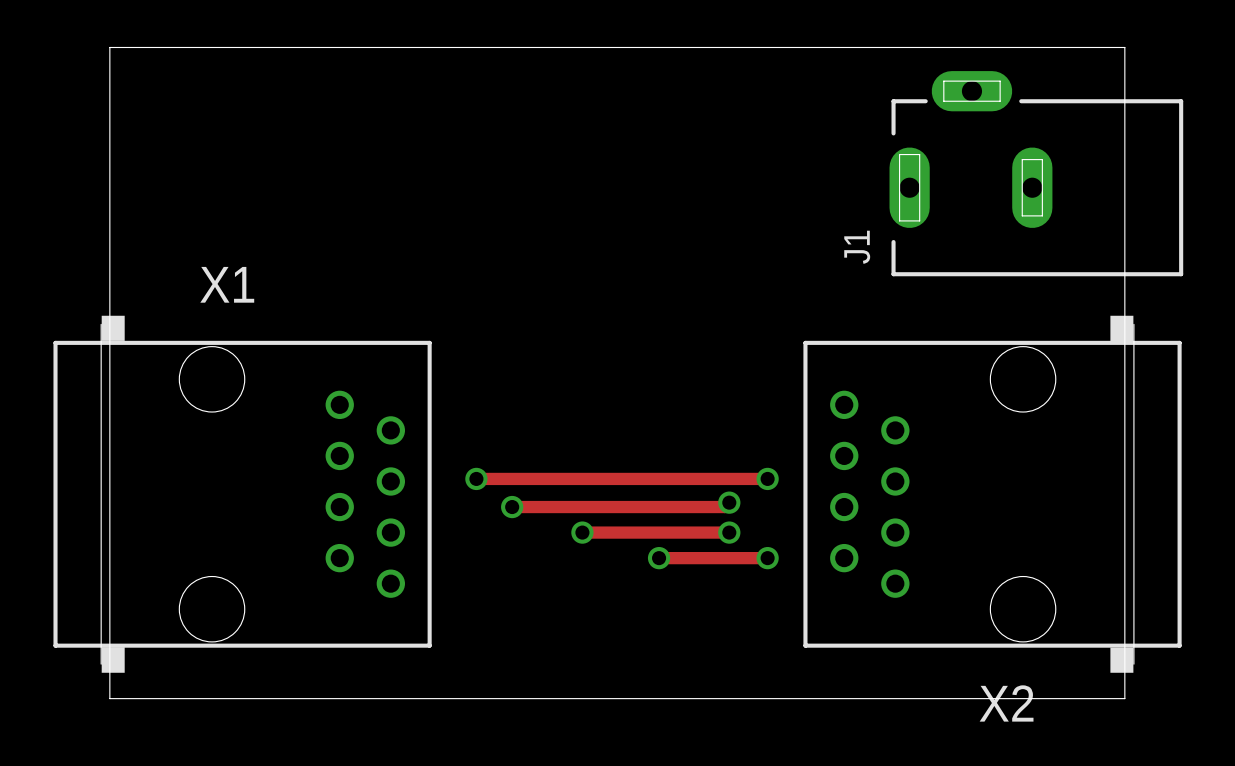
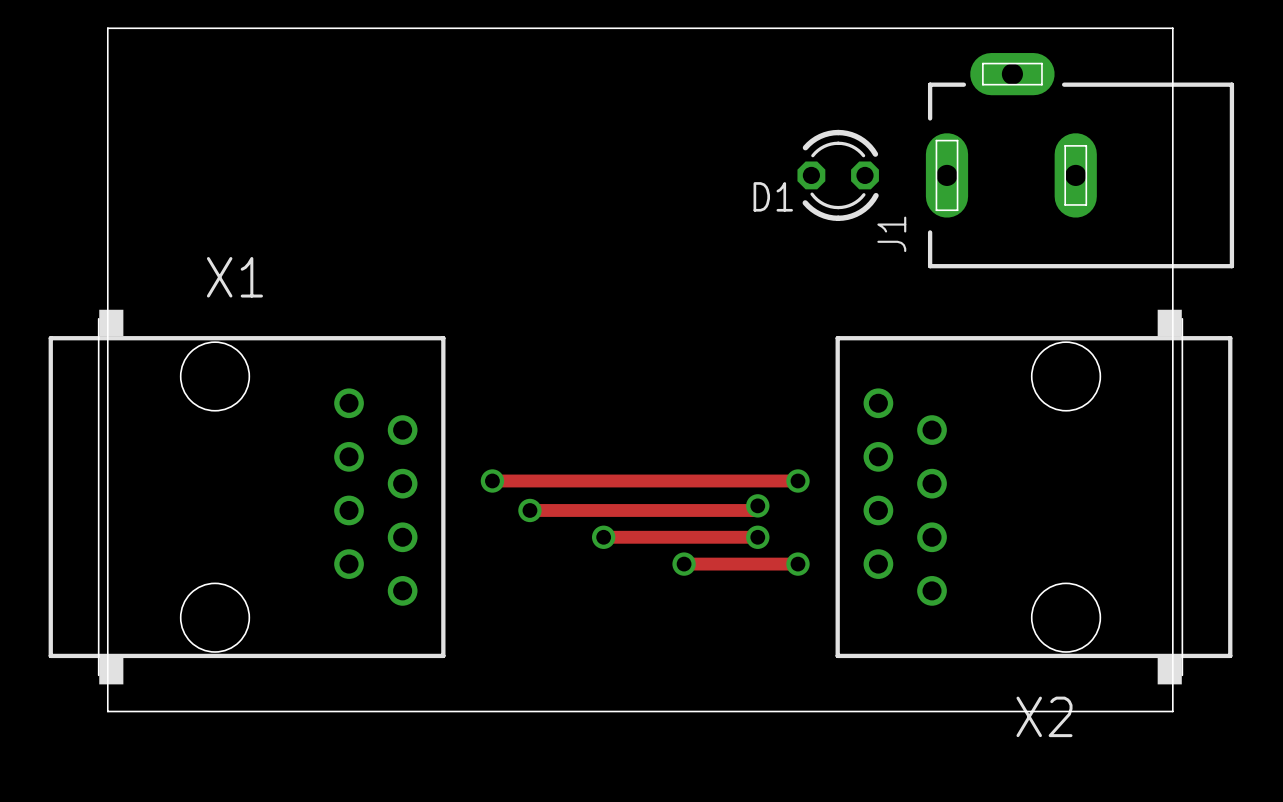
D1: none -> (838, 175)

